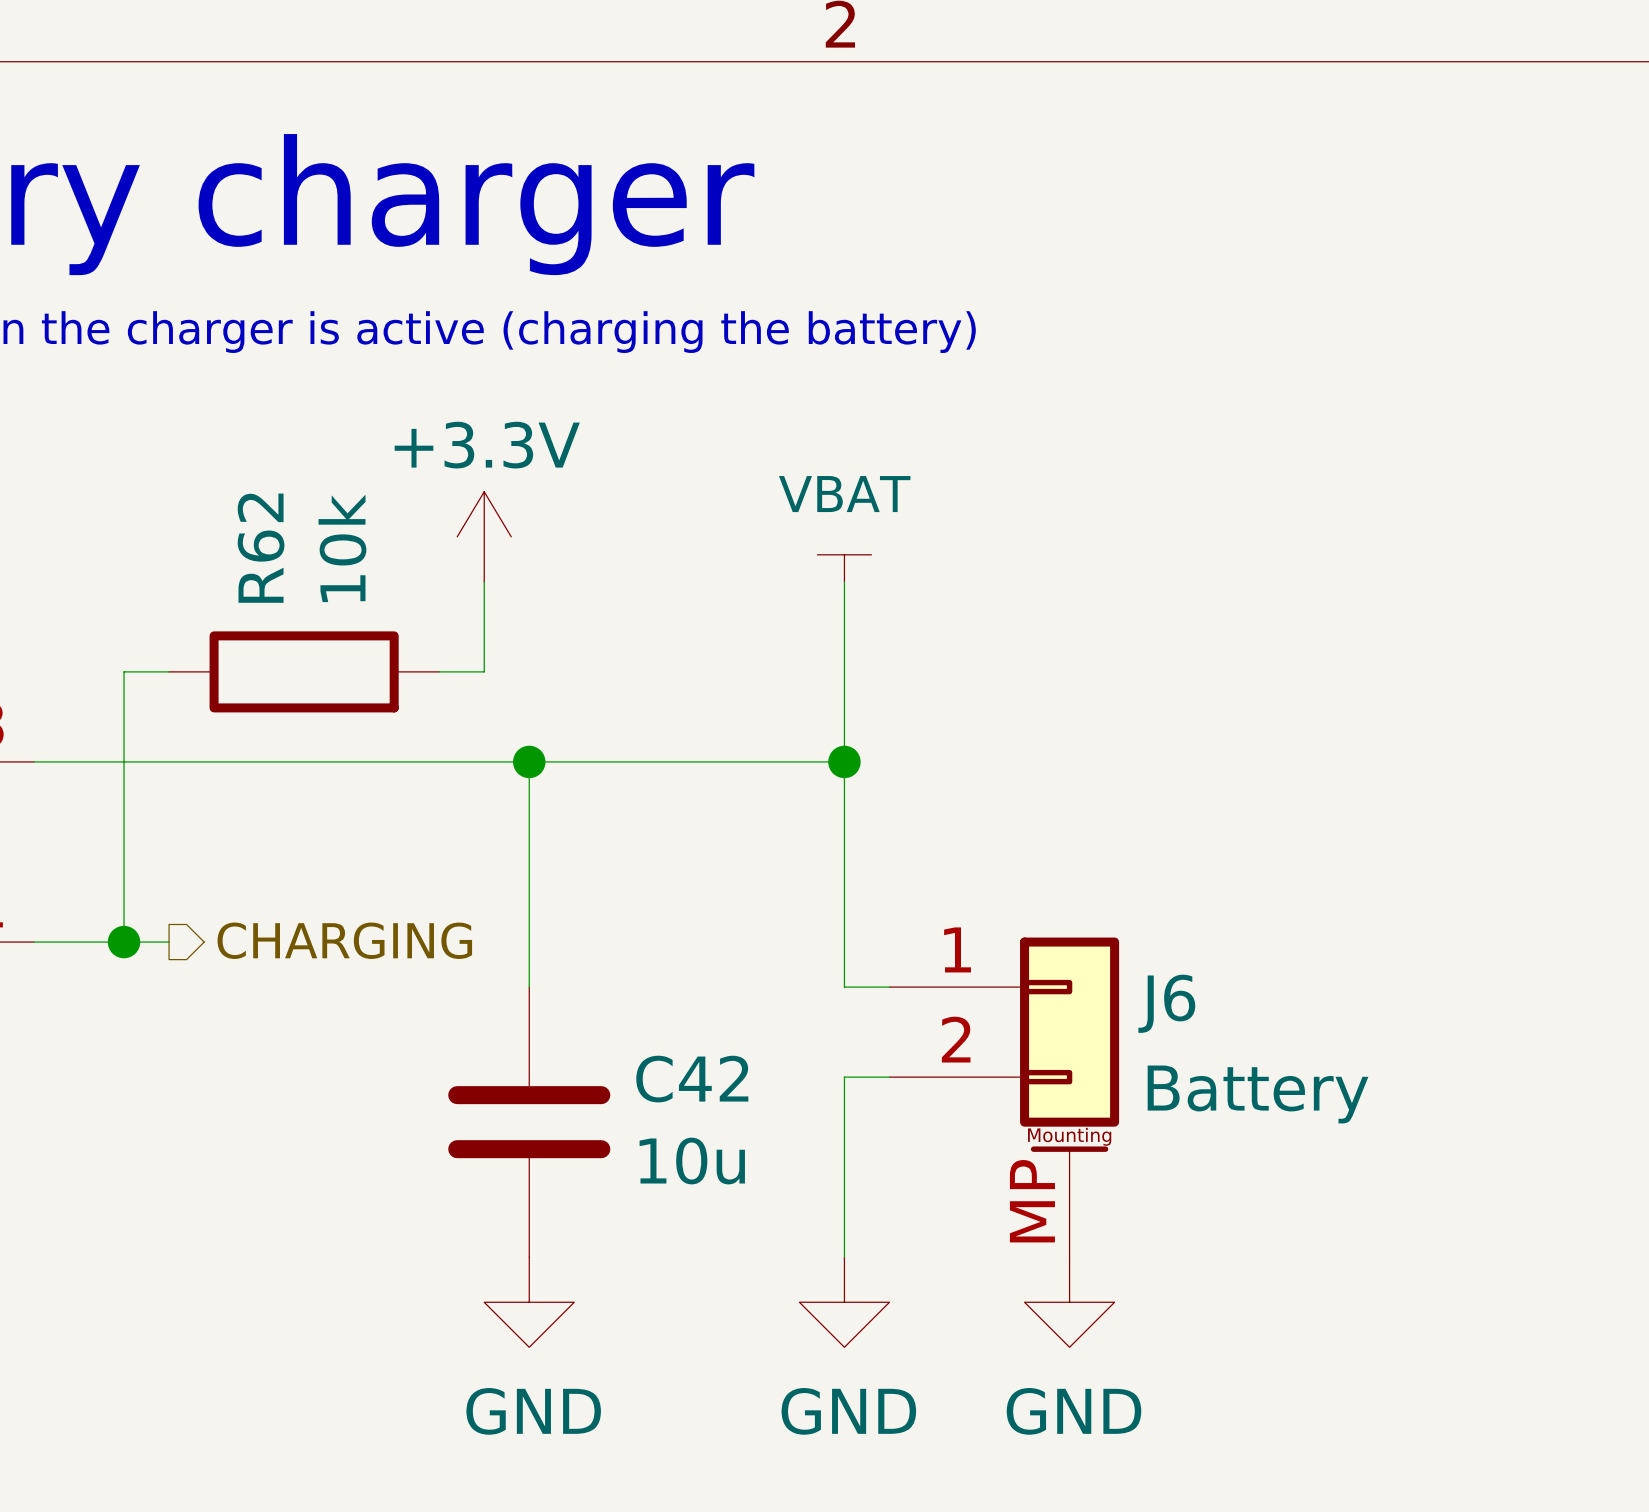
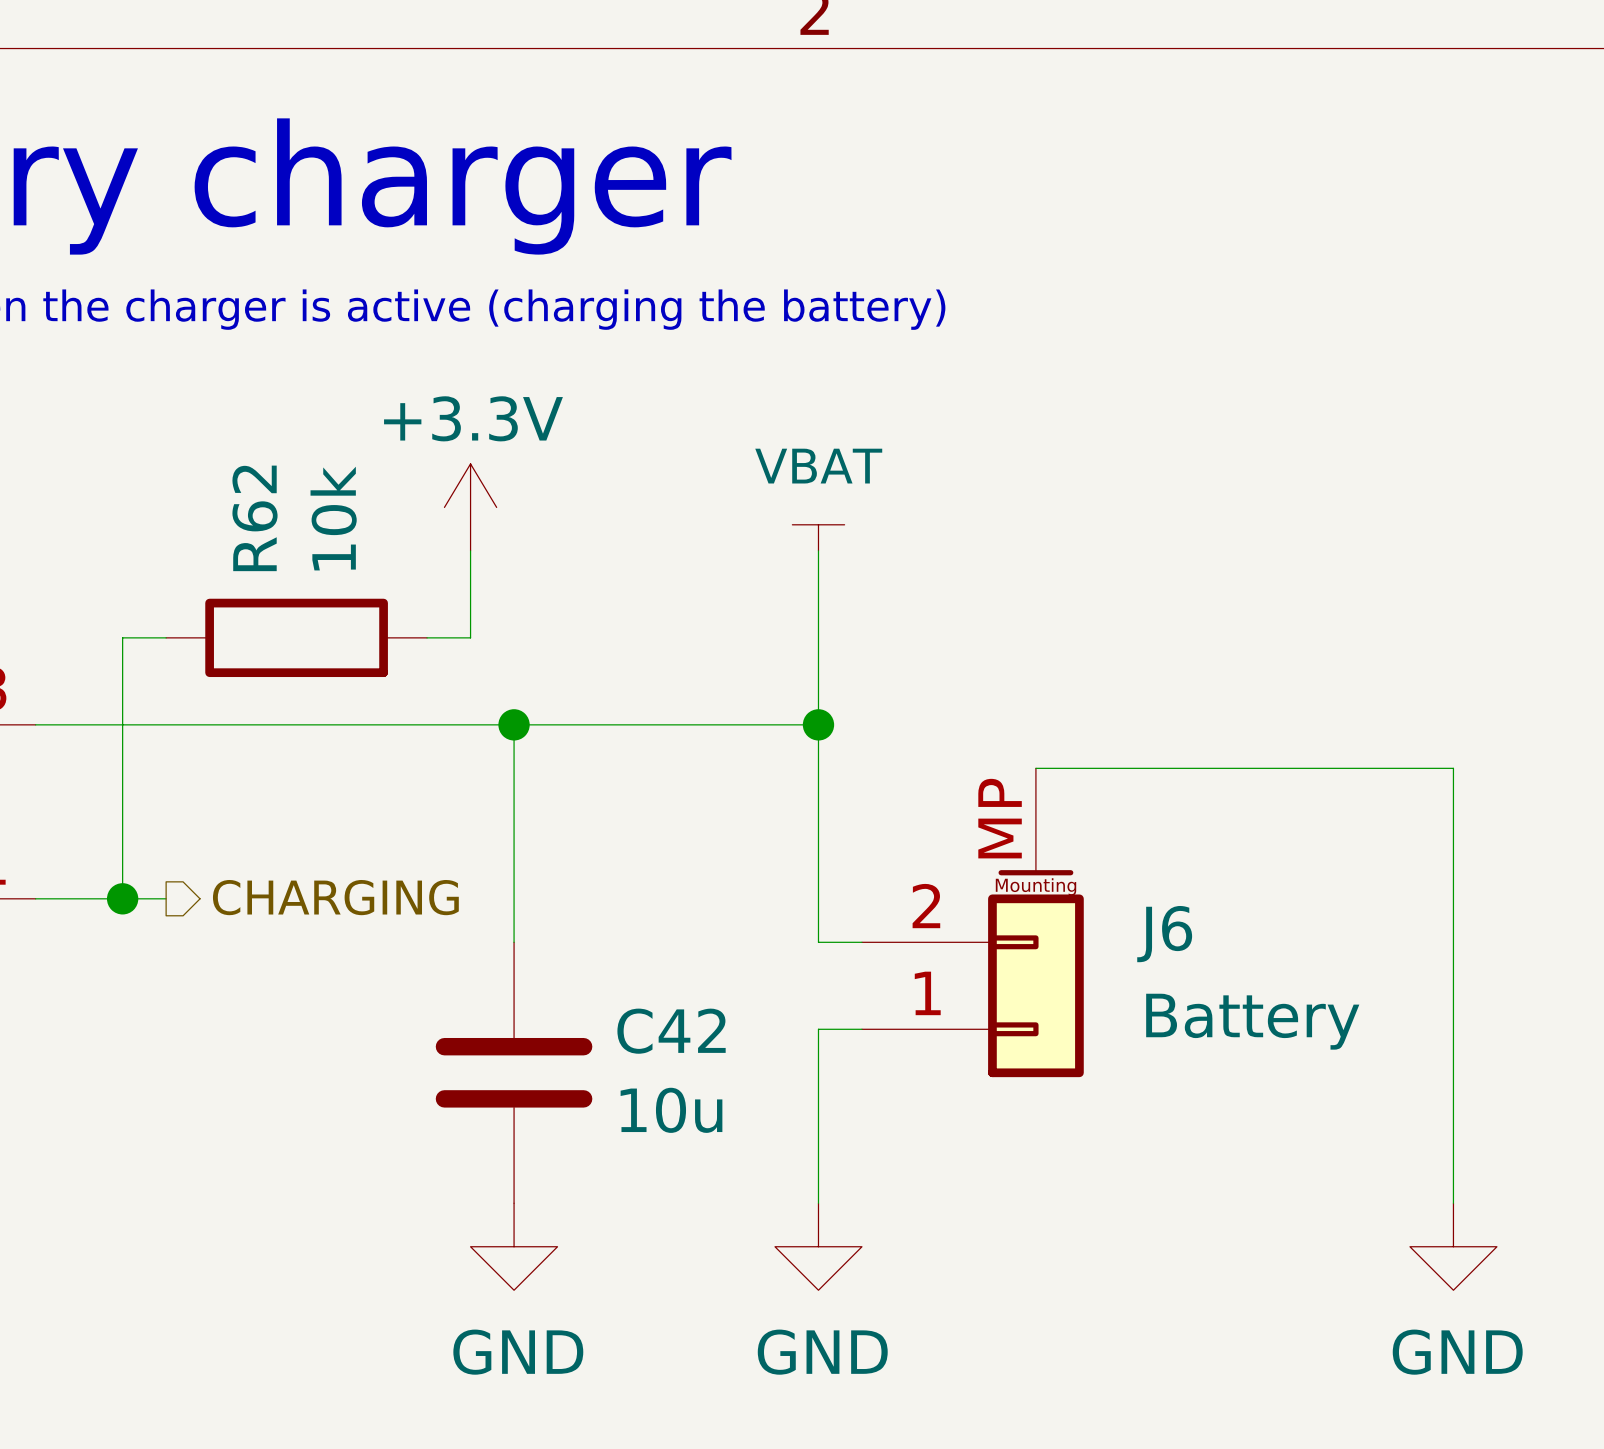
wire: none -> (1035, 768) (1453, 768) (1453, 1203)
J6 name position: J6 (1166, 1003) -> J6 (1164, 934)
J6 flip: as is (1069, 1044) -> up-down (1035, 973)
J6 value position: Battery (1258, 1094) -> Battery (1252, 1021)
power symbol position: GND (1069, 1302) -> GND (1453, 1246)

